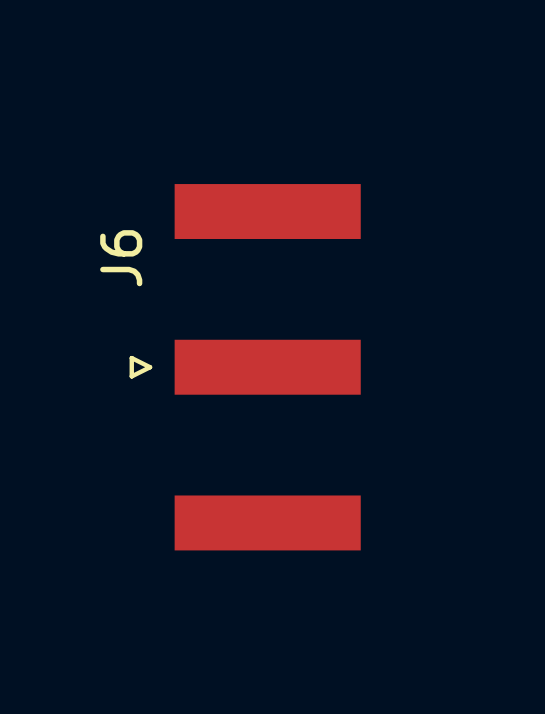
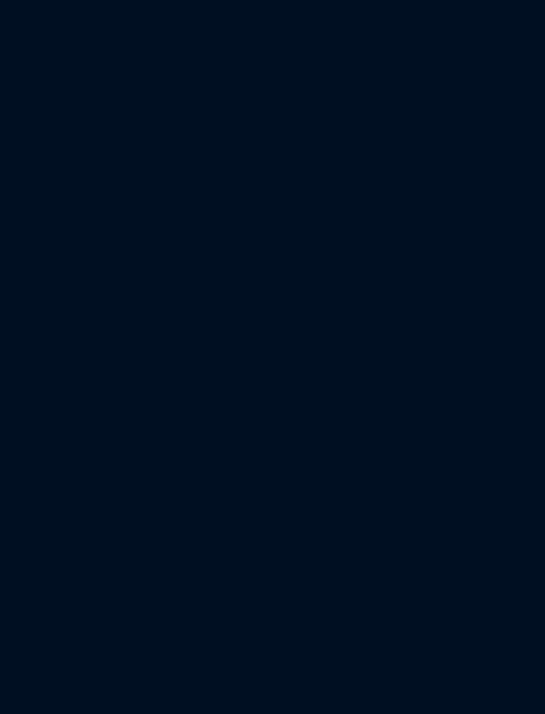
J6: (245, 367) -> none

